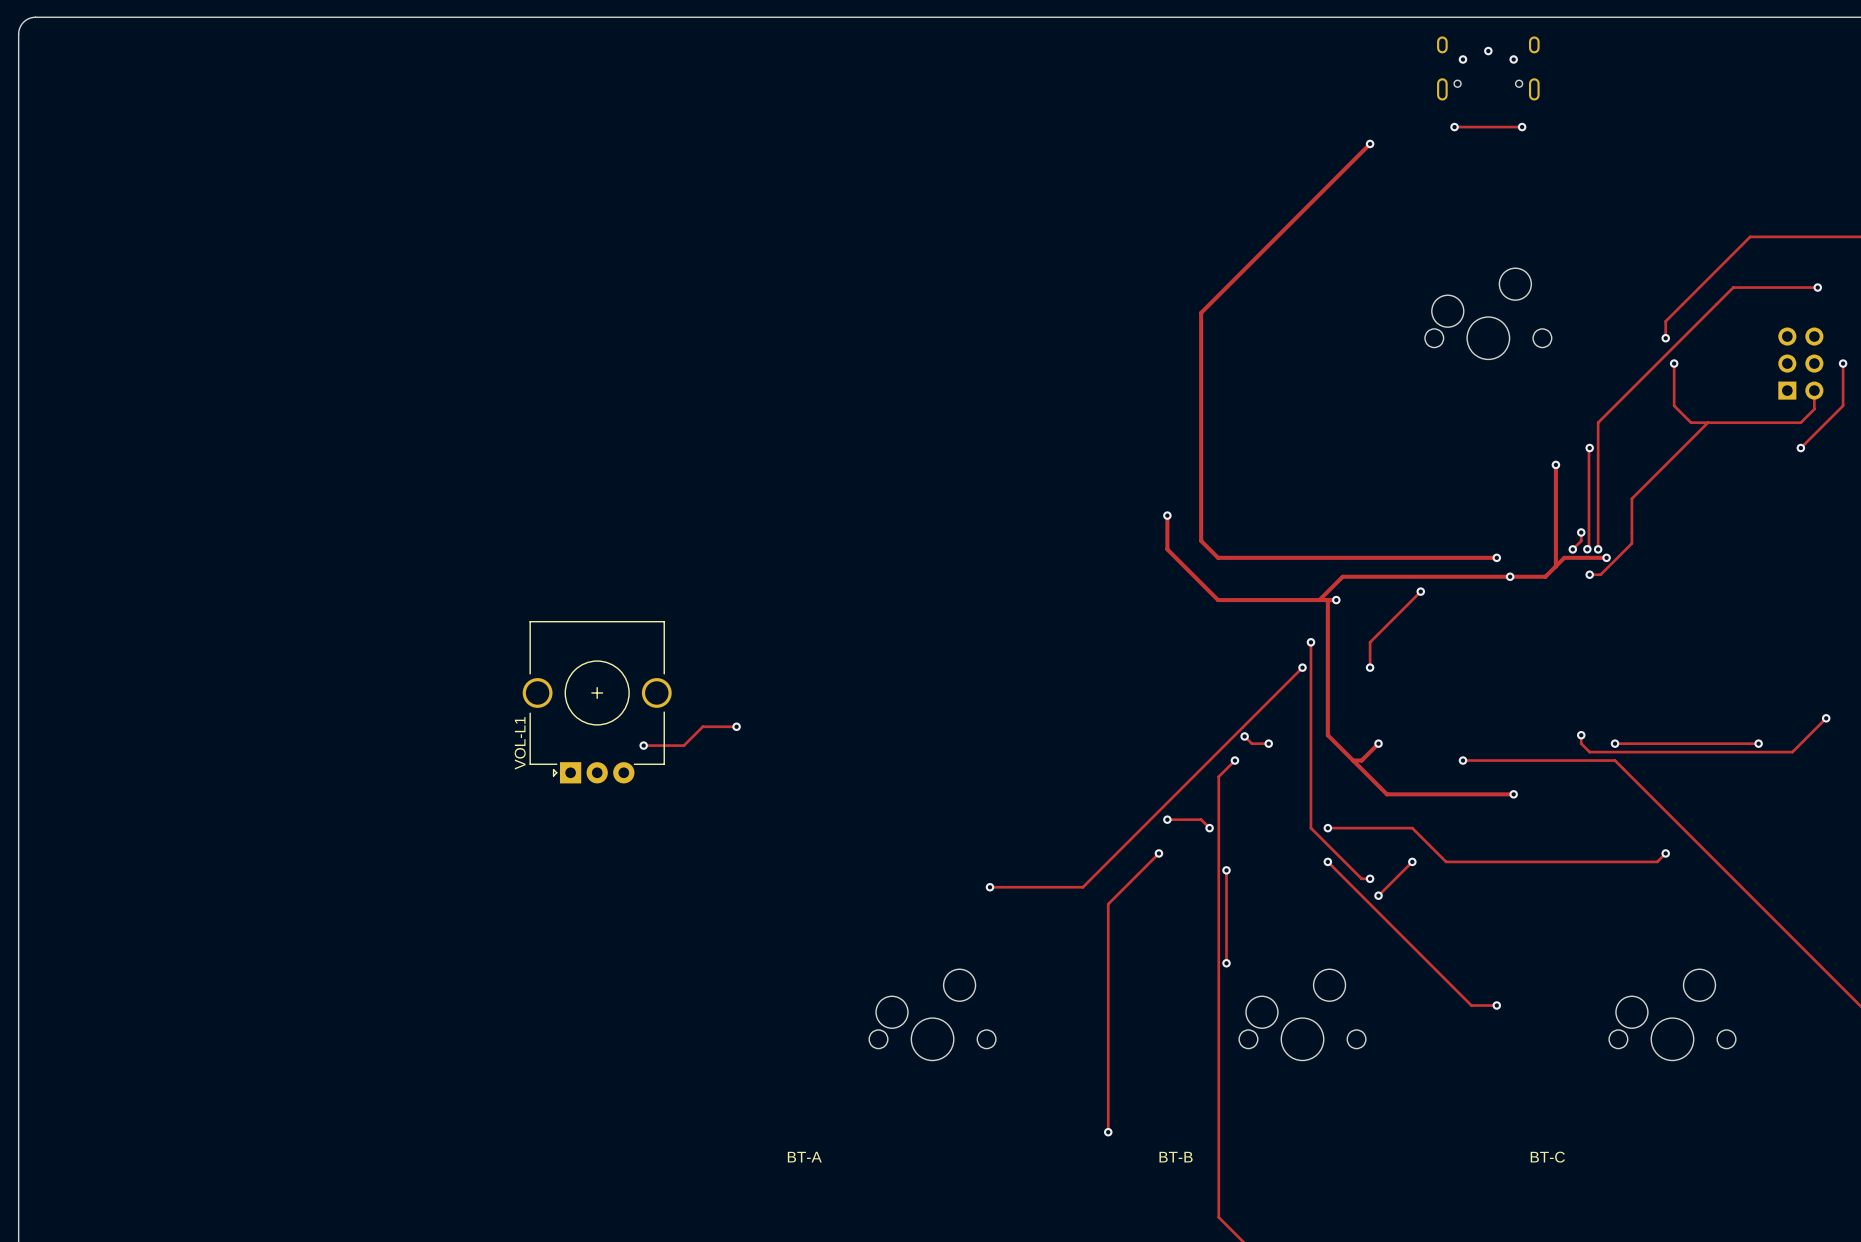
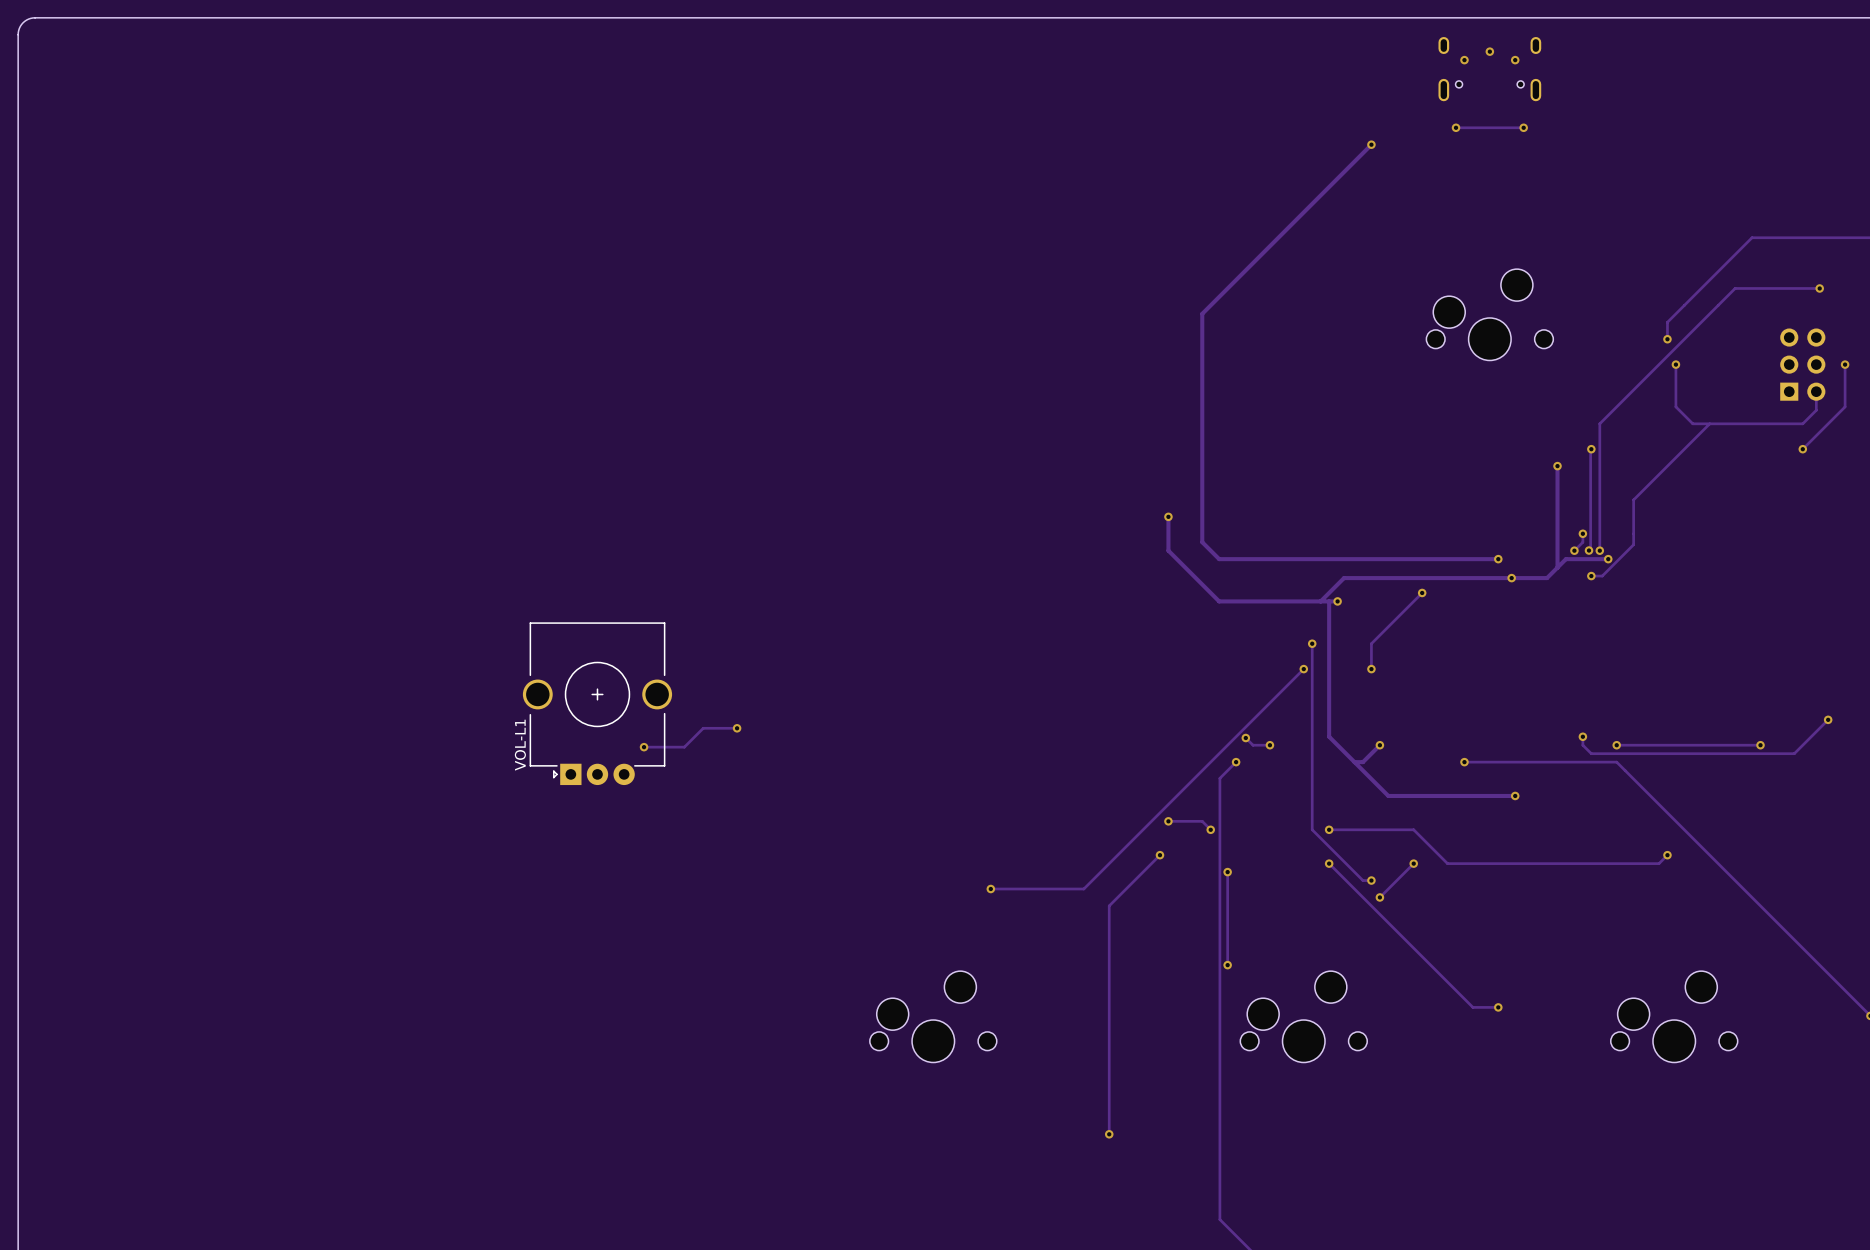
text: BT-A (804, 1157) -> none
text: BT-B (1176, 1157) -> none
text: BT-C (1547, 1157) -> none

